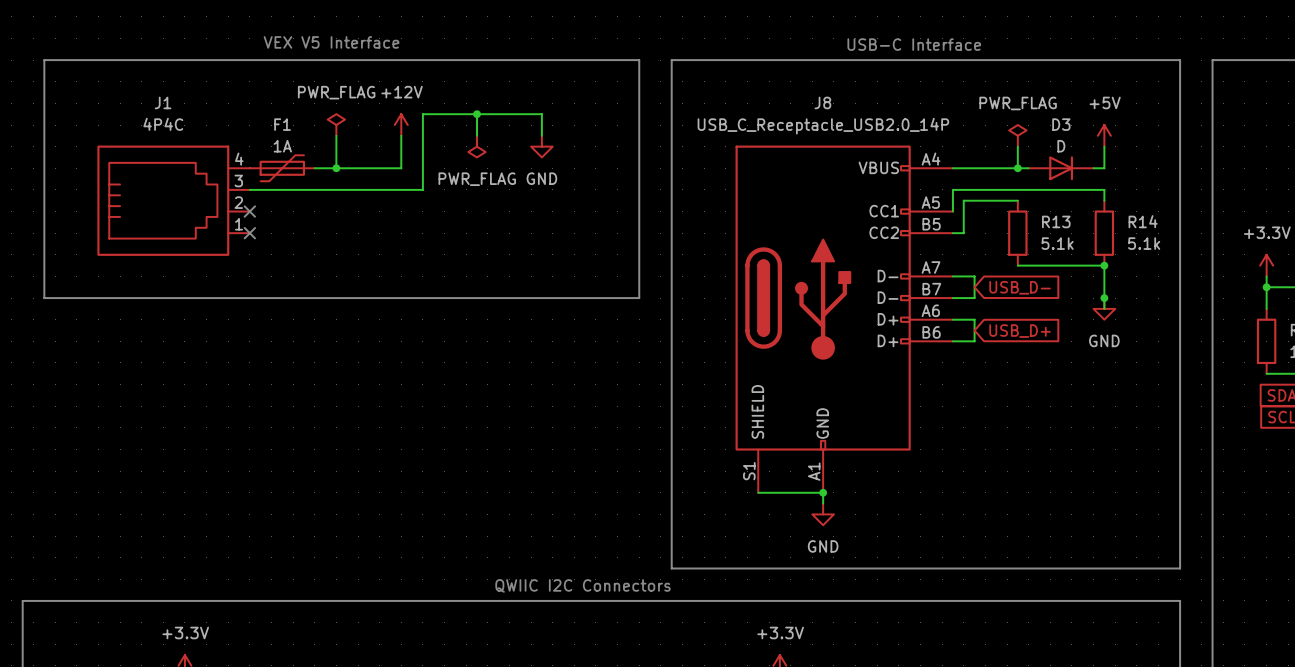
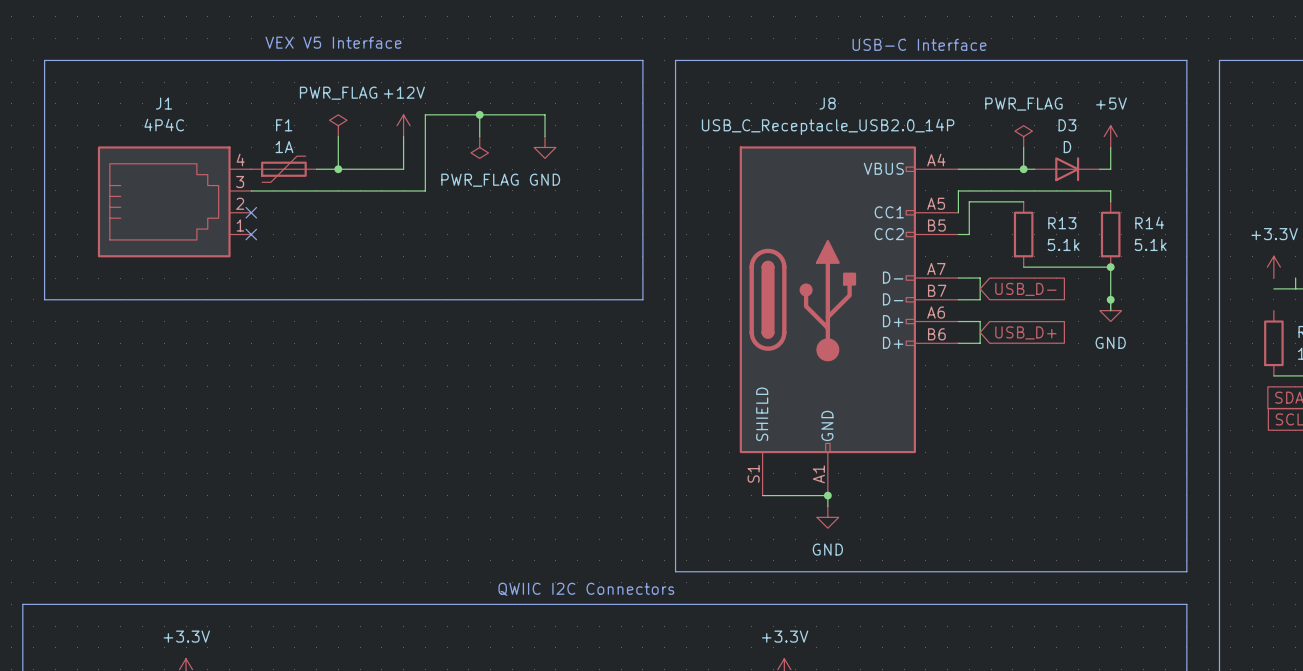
wire: (1266, 276) (1266, 308) -> none
wire: none -> (1295, 278) (1295, 288)
junction: (1266, 287) -> none

